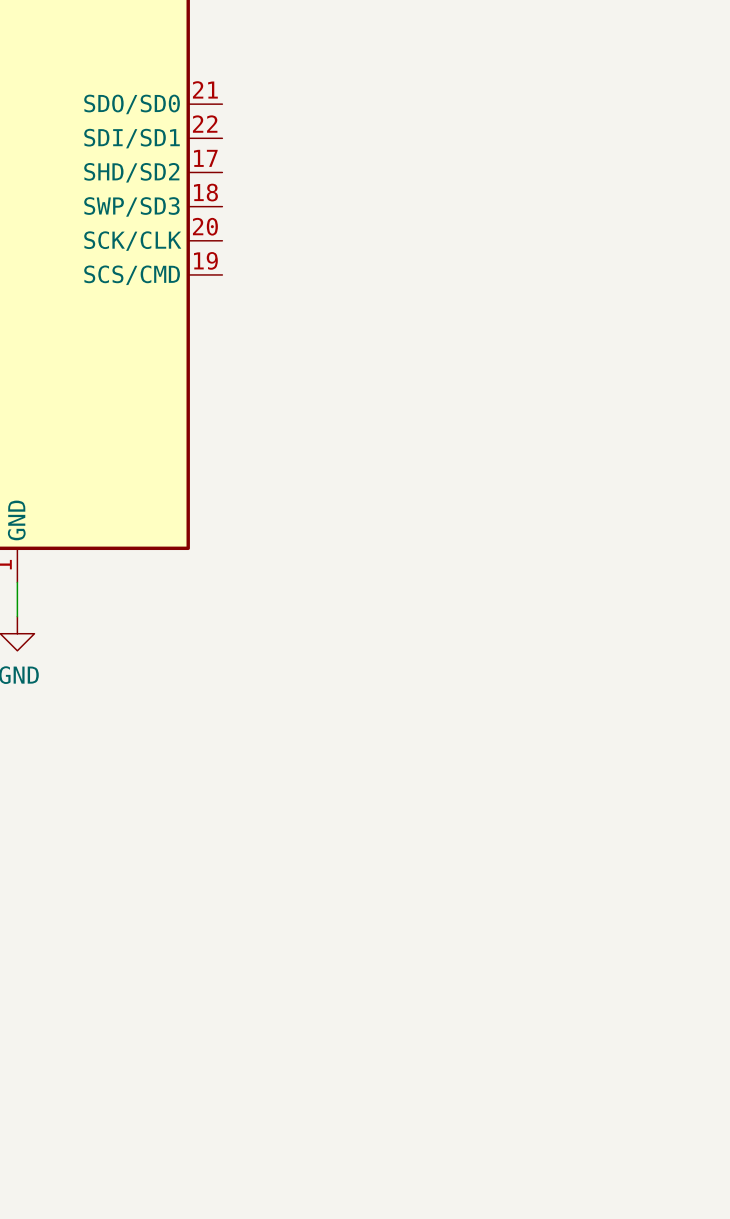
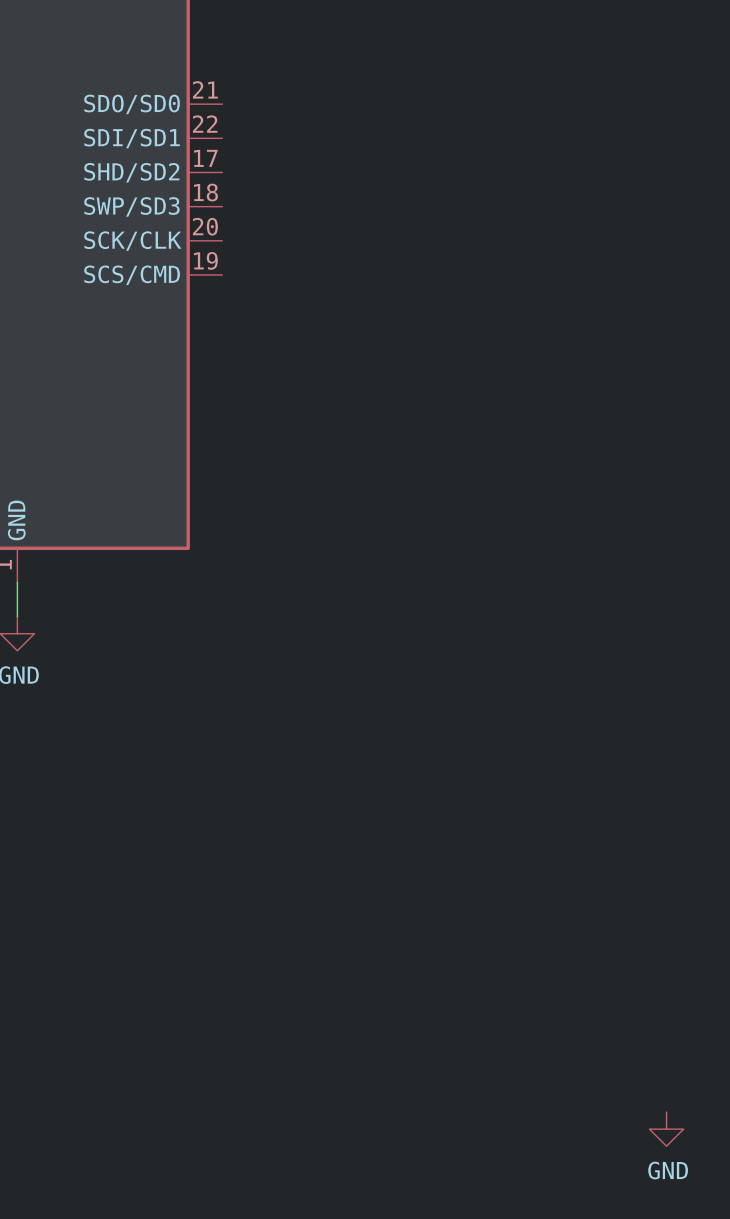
power symbol: none -> GND (666, 1129)

